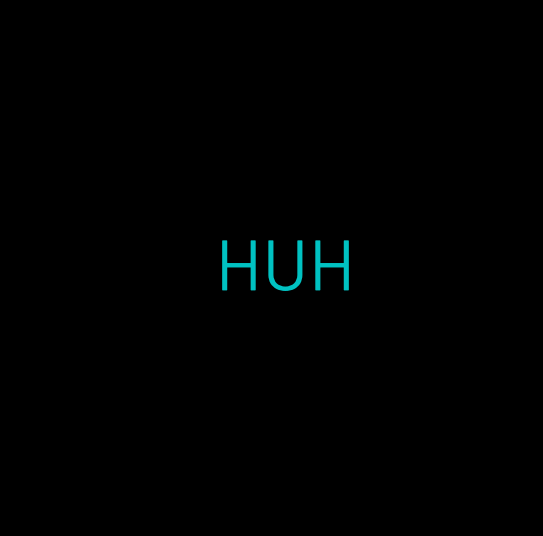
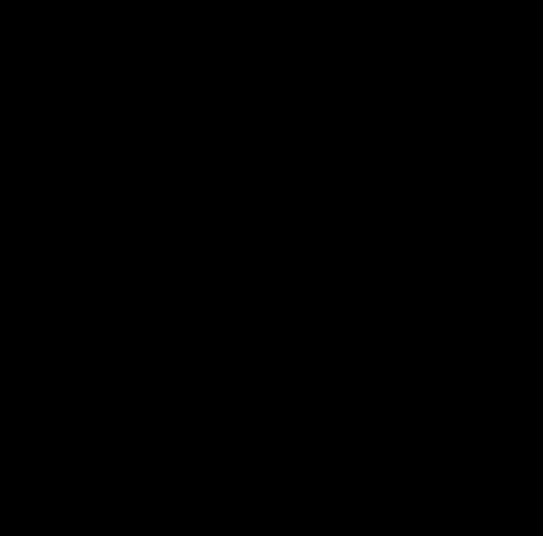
text: HUH (285, 265) -> none

